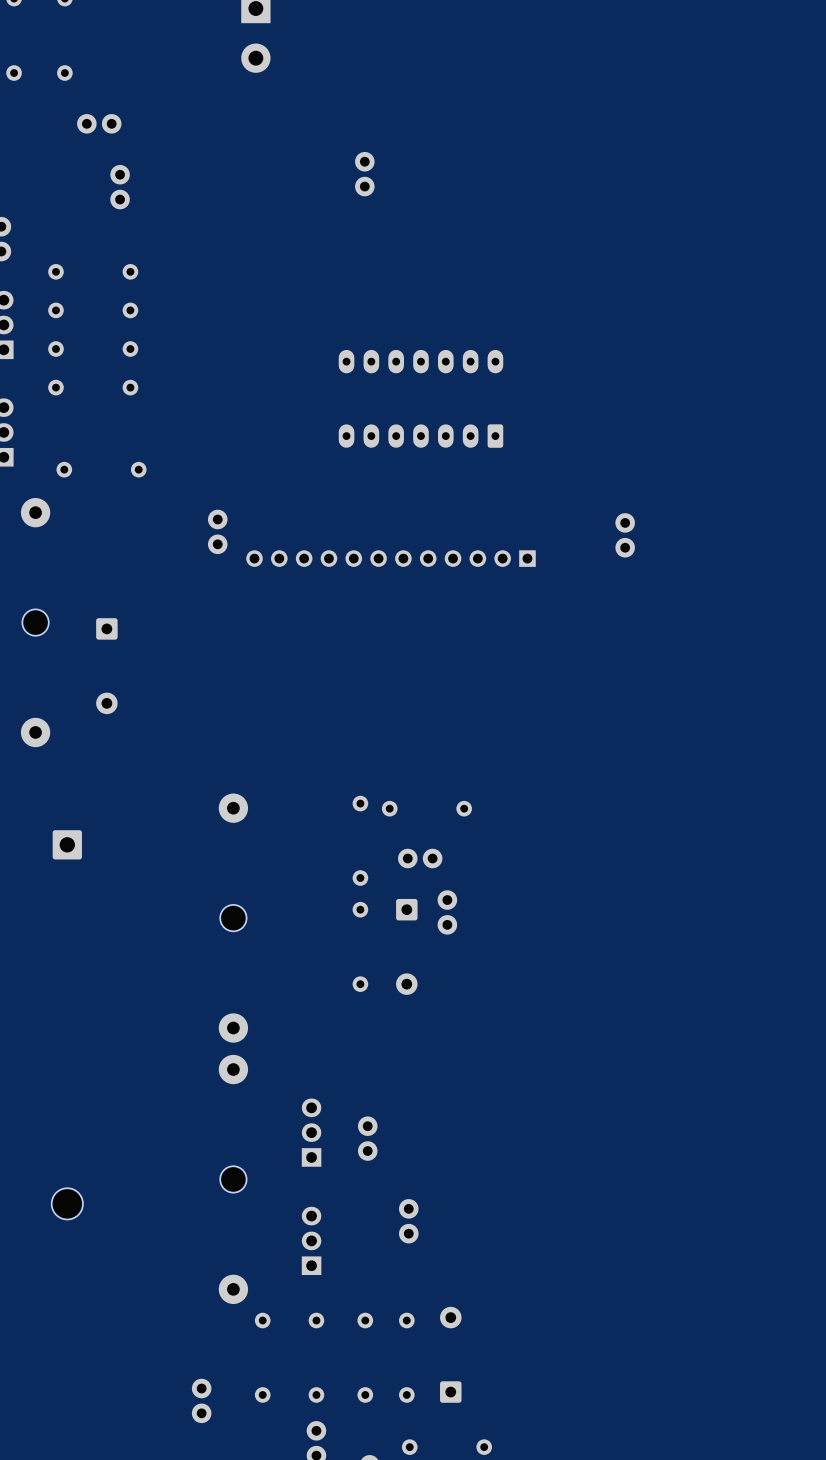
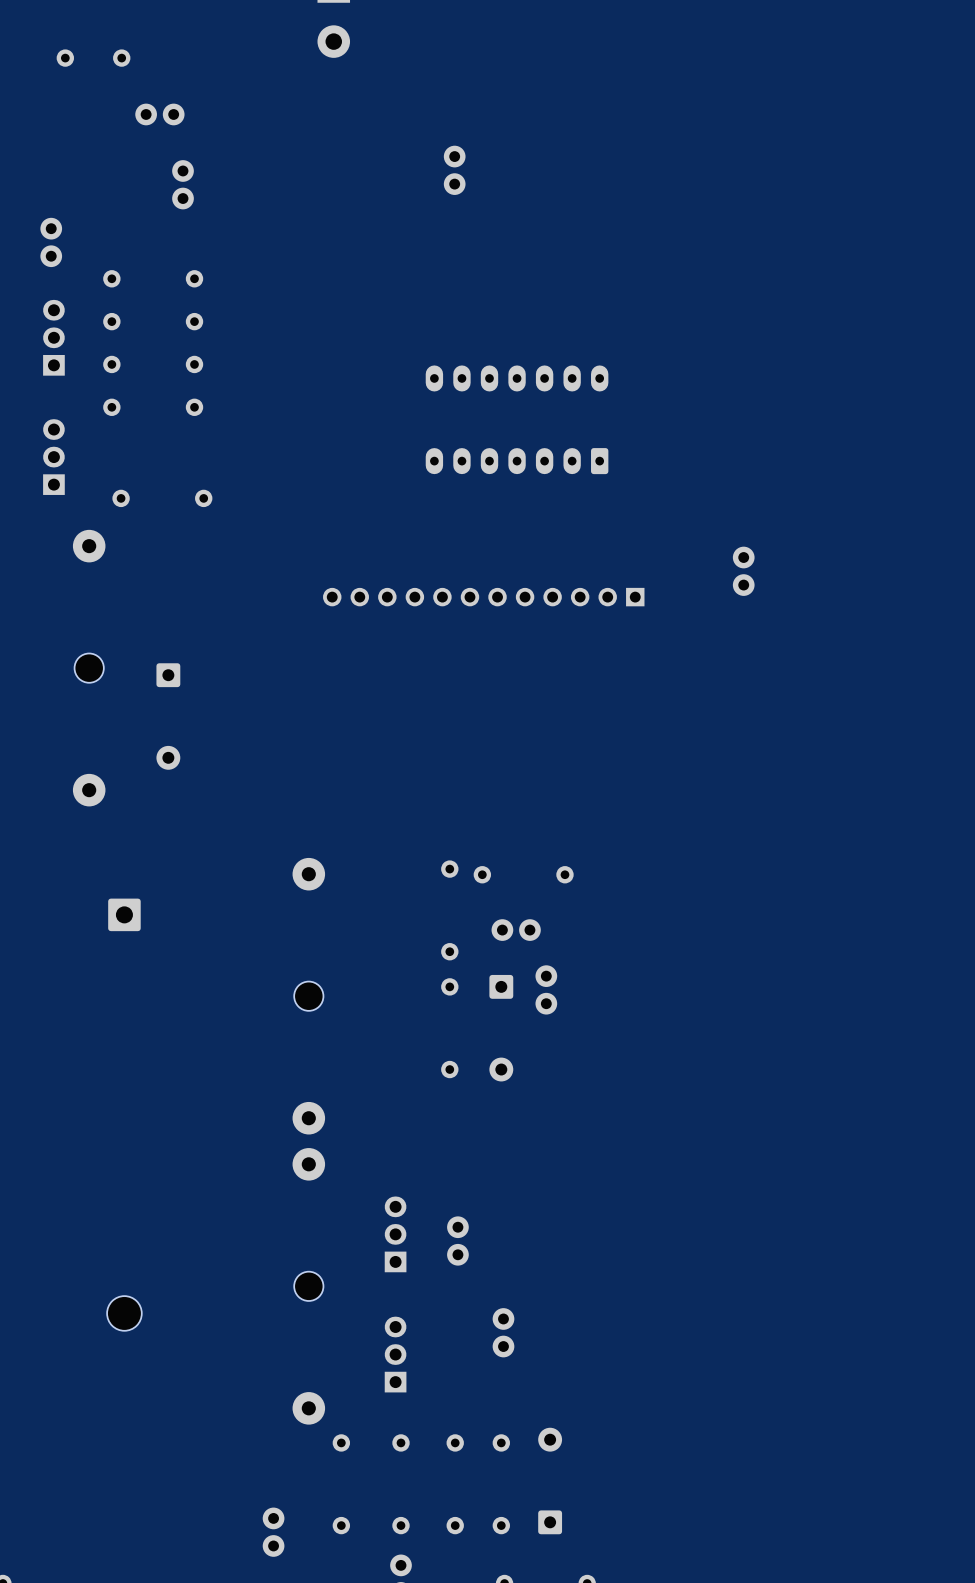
part: (217, 531) -> none

